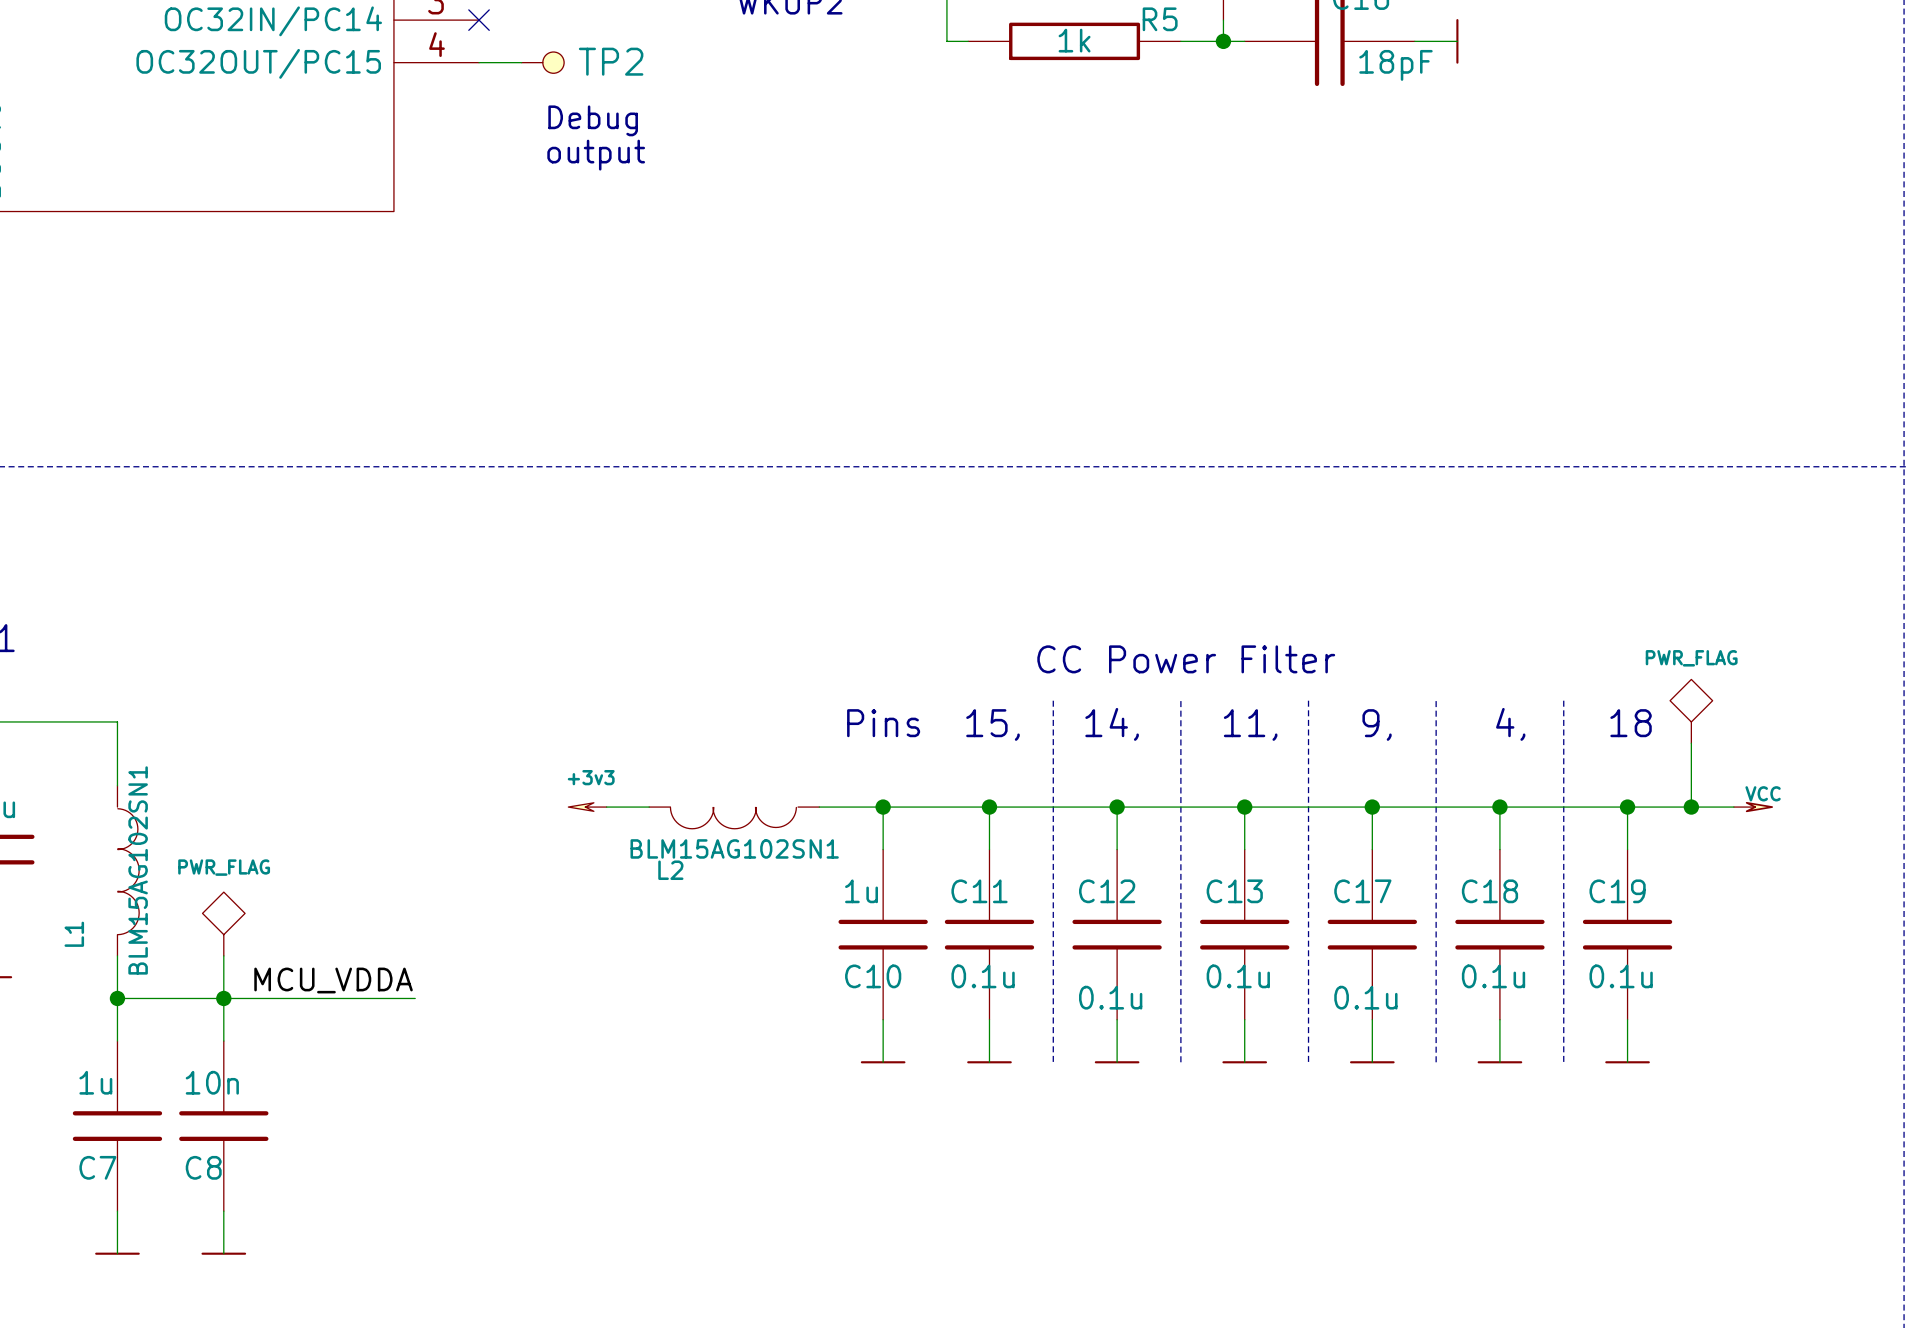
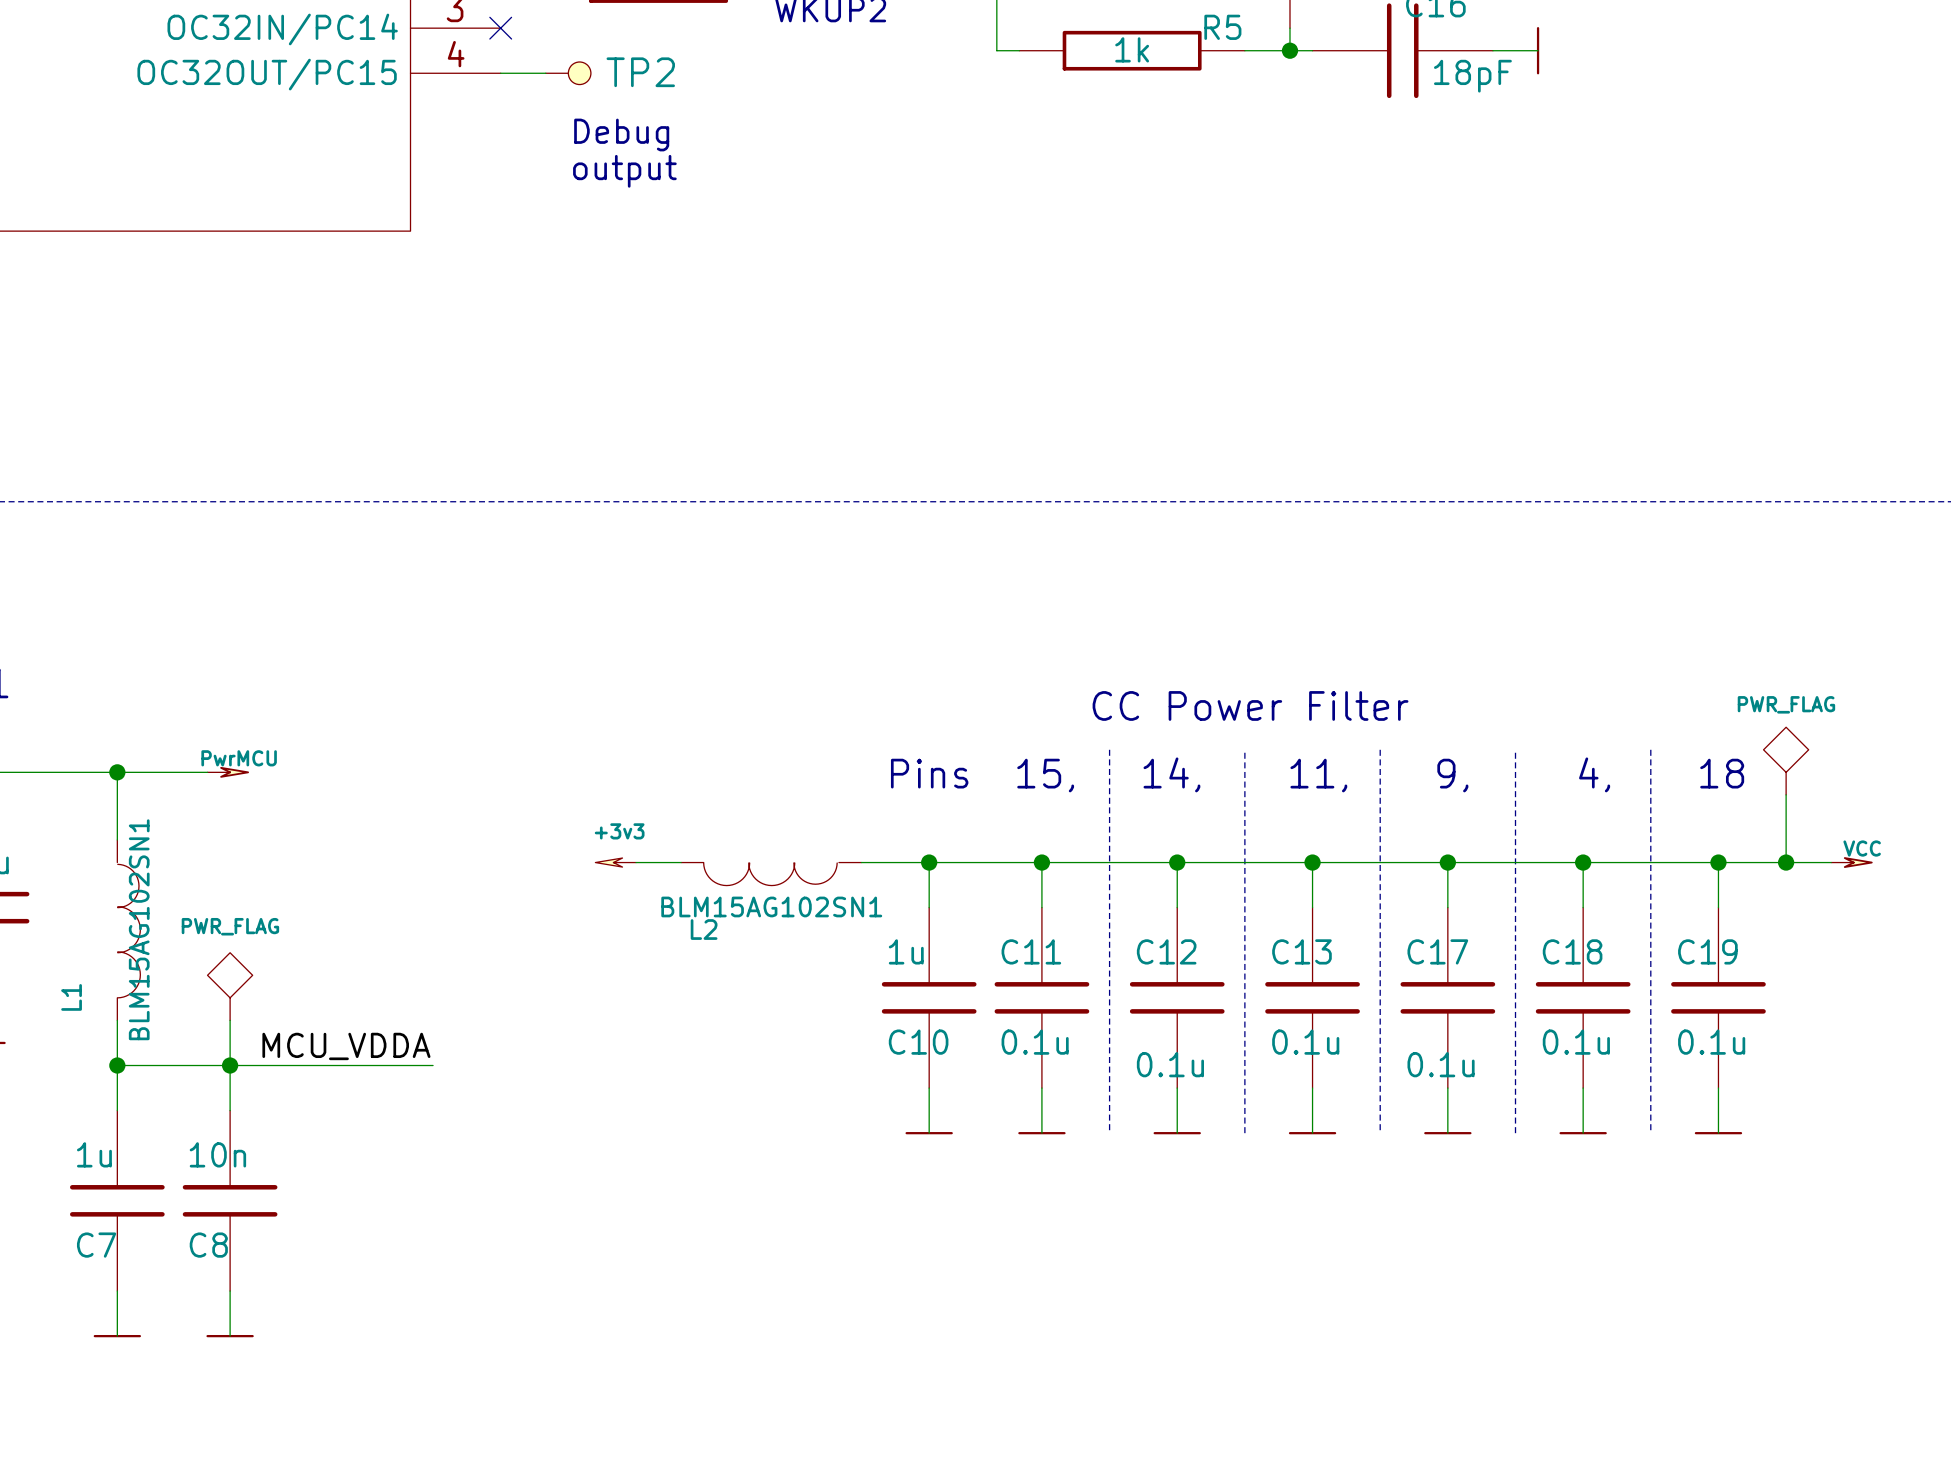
wire: none -> (117, 772) (207, 772)
junction: none -> (117, 772)
power symbol: none -> PwrMCU (228, 772)

